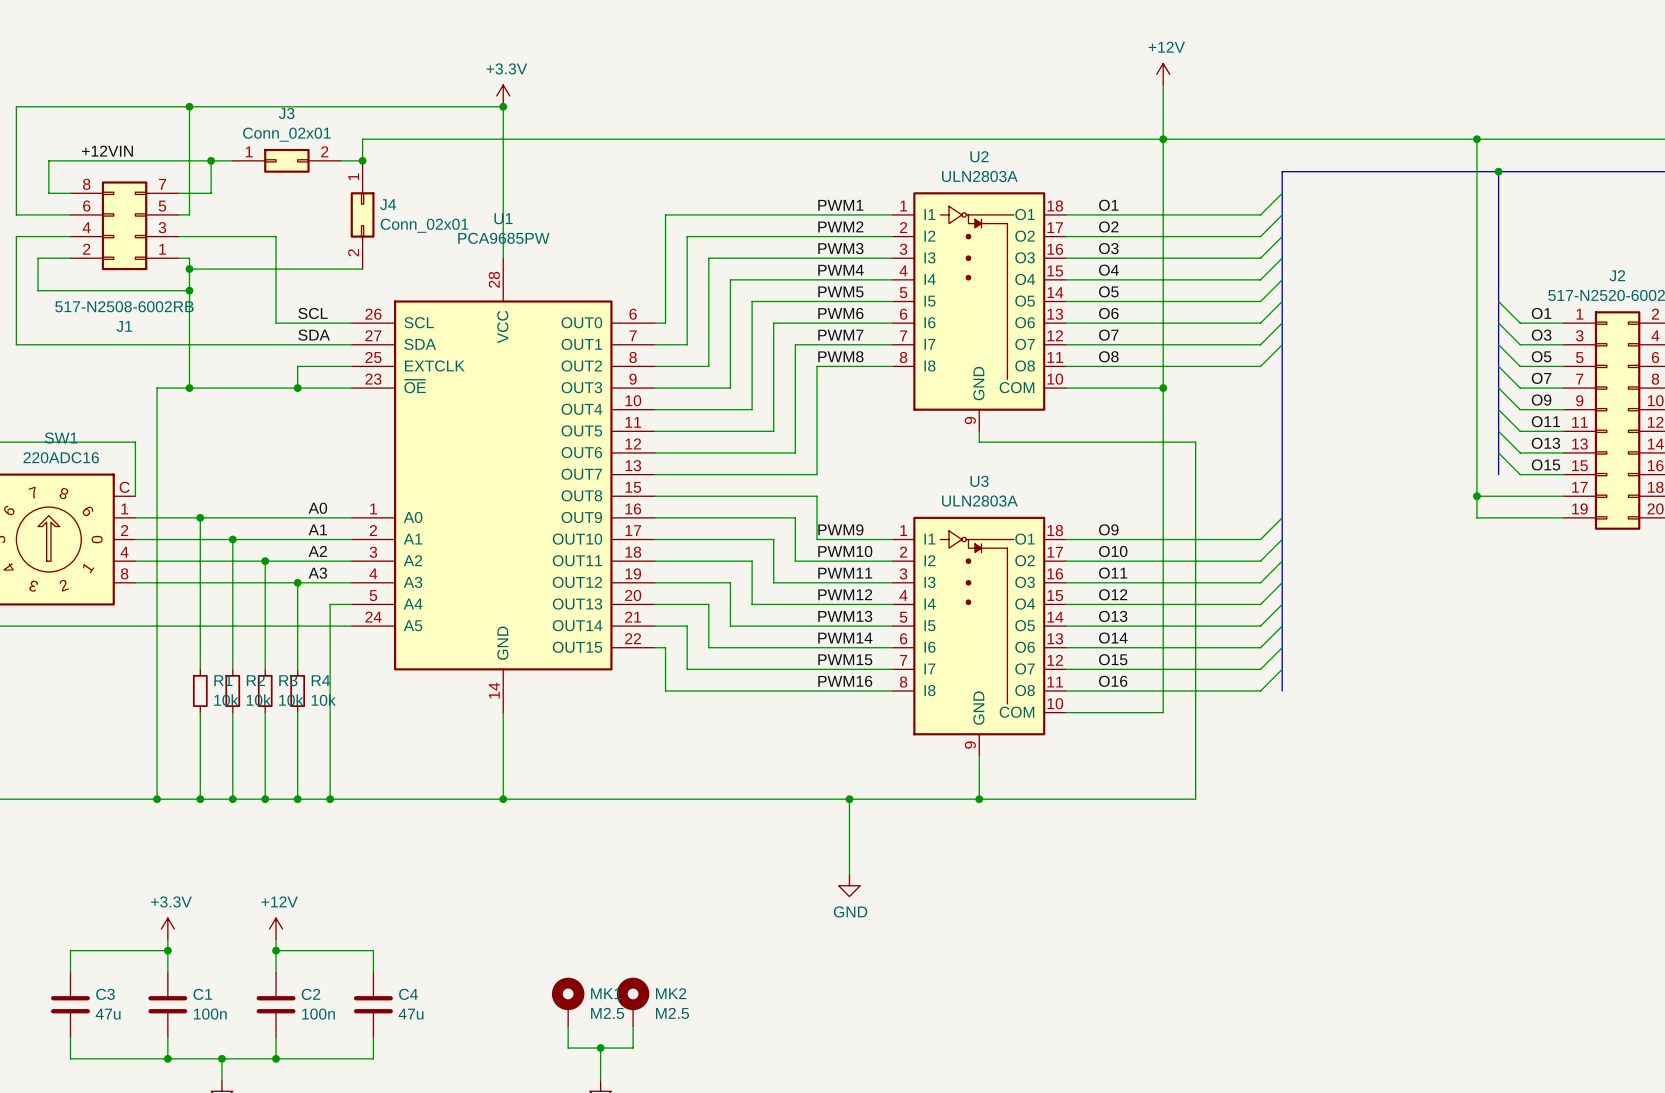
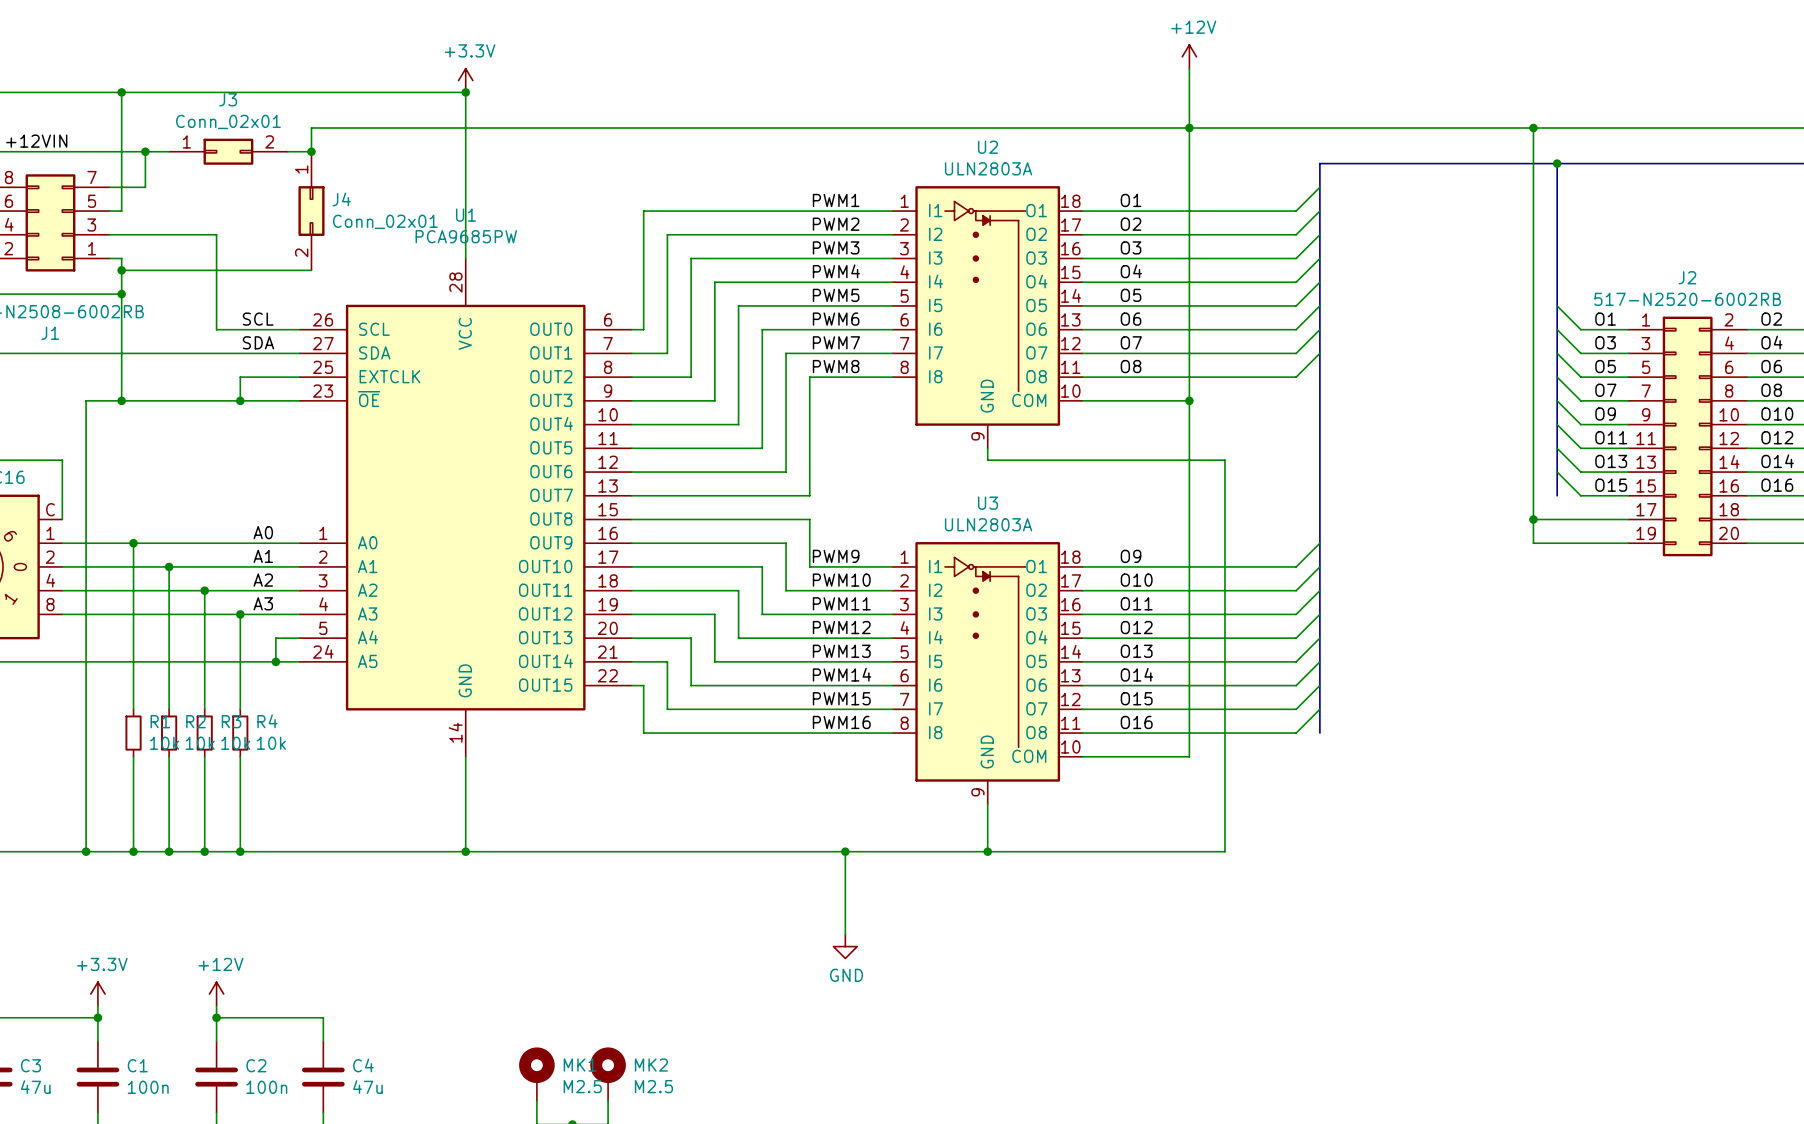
wire: (330, 626) (330, 799) -> none
junction: none -> (275, 661)
junction: (330, 799) -> none

